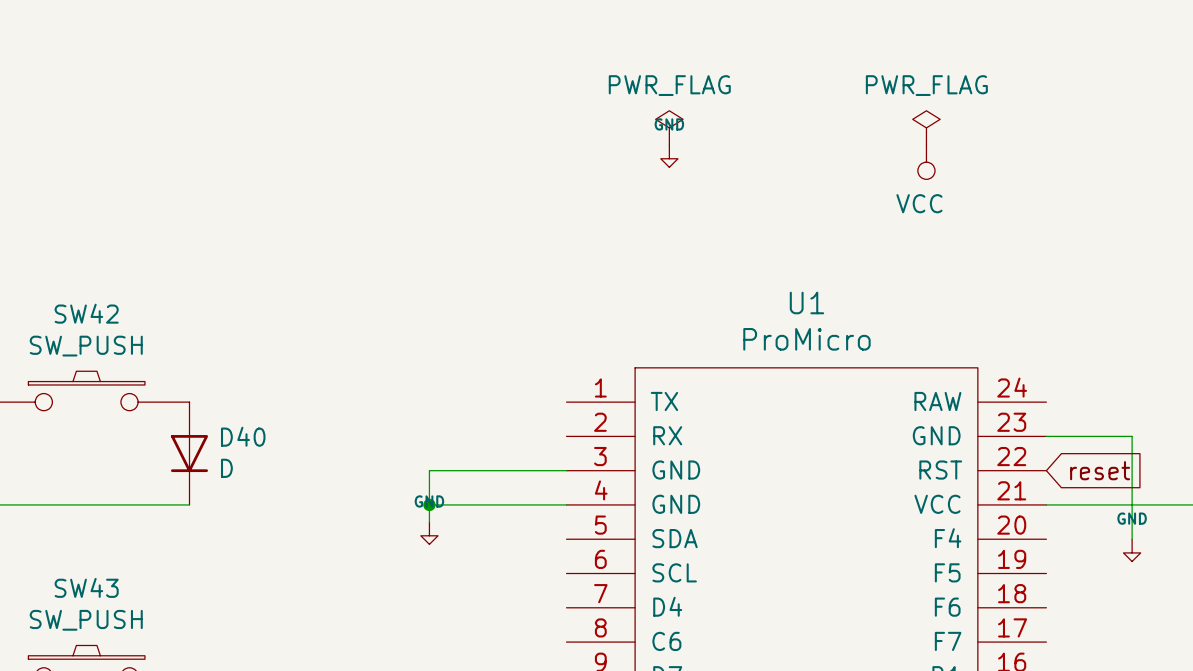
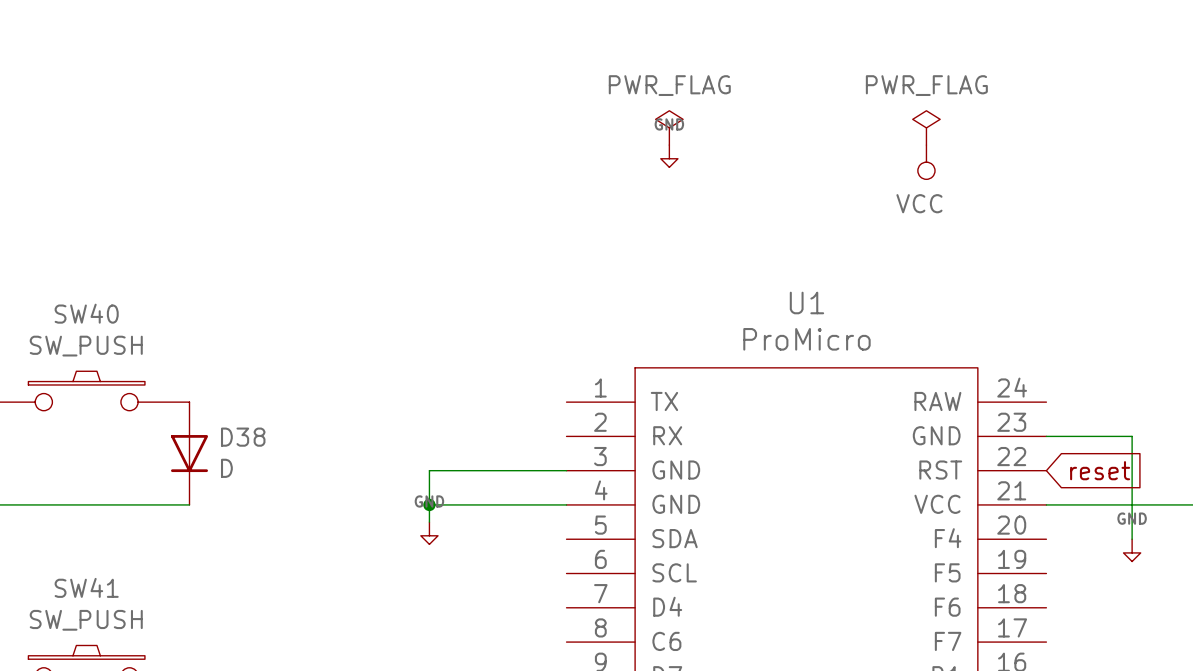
SW42 name: SW42 (86, 313) -> SW40 (86, 313)
D40 name: D40 (243, 436) -> D38 (243, 437)
SW43 name: SW43 (86, 587) -> SW41 (86, 587)

